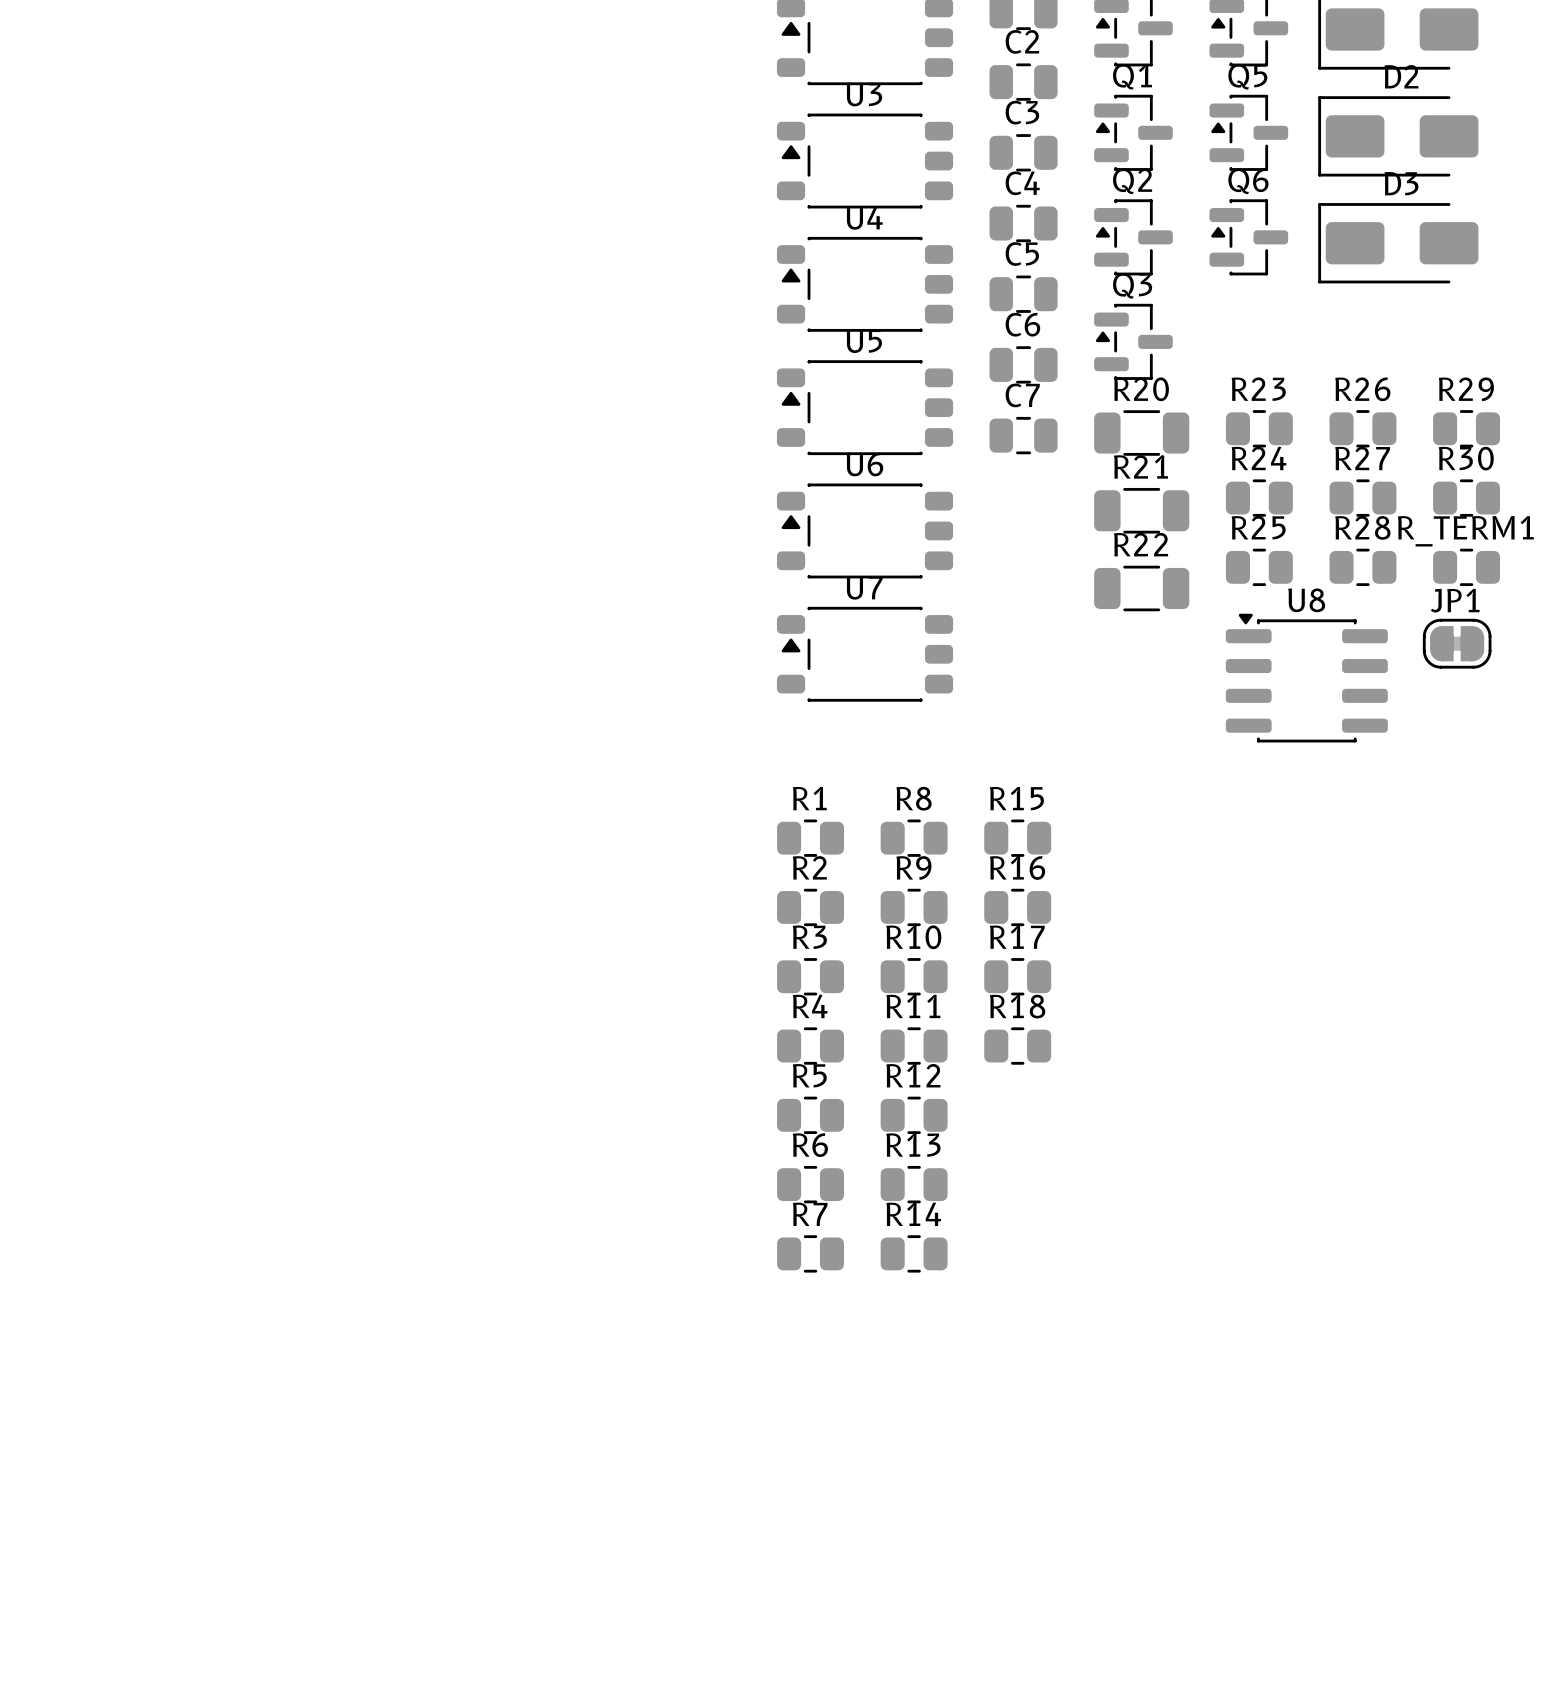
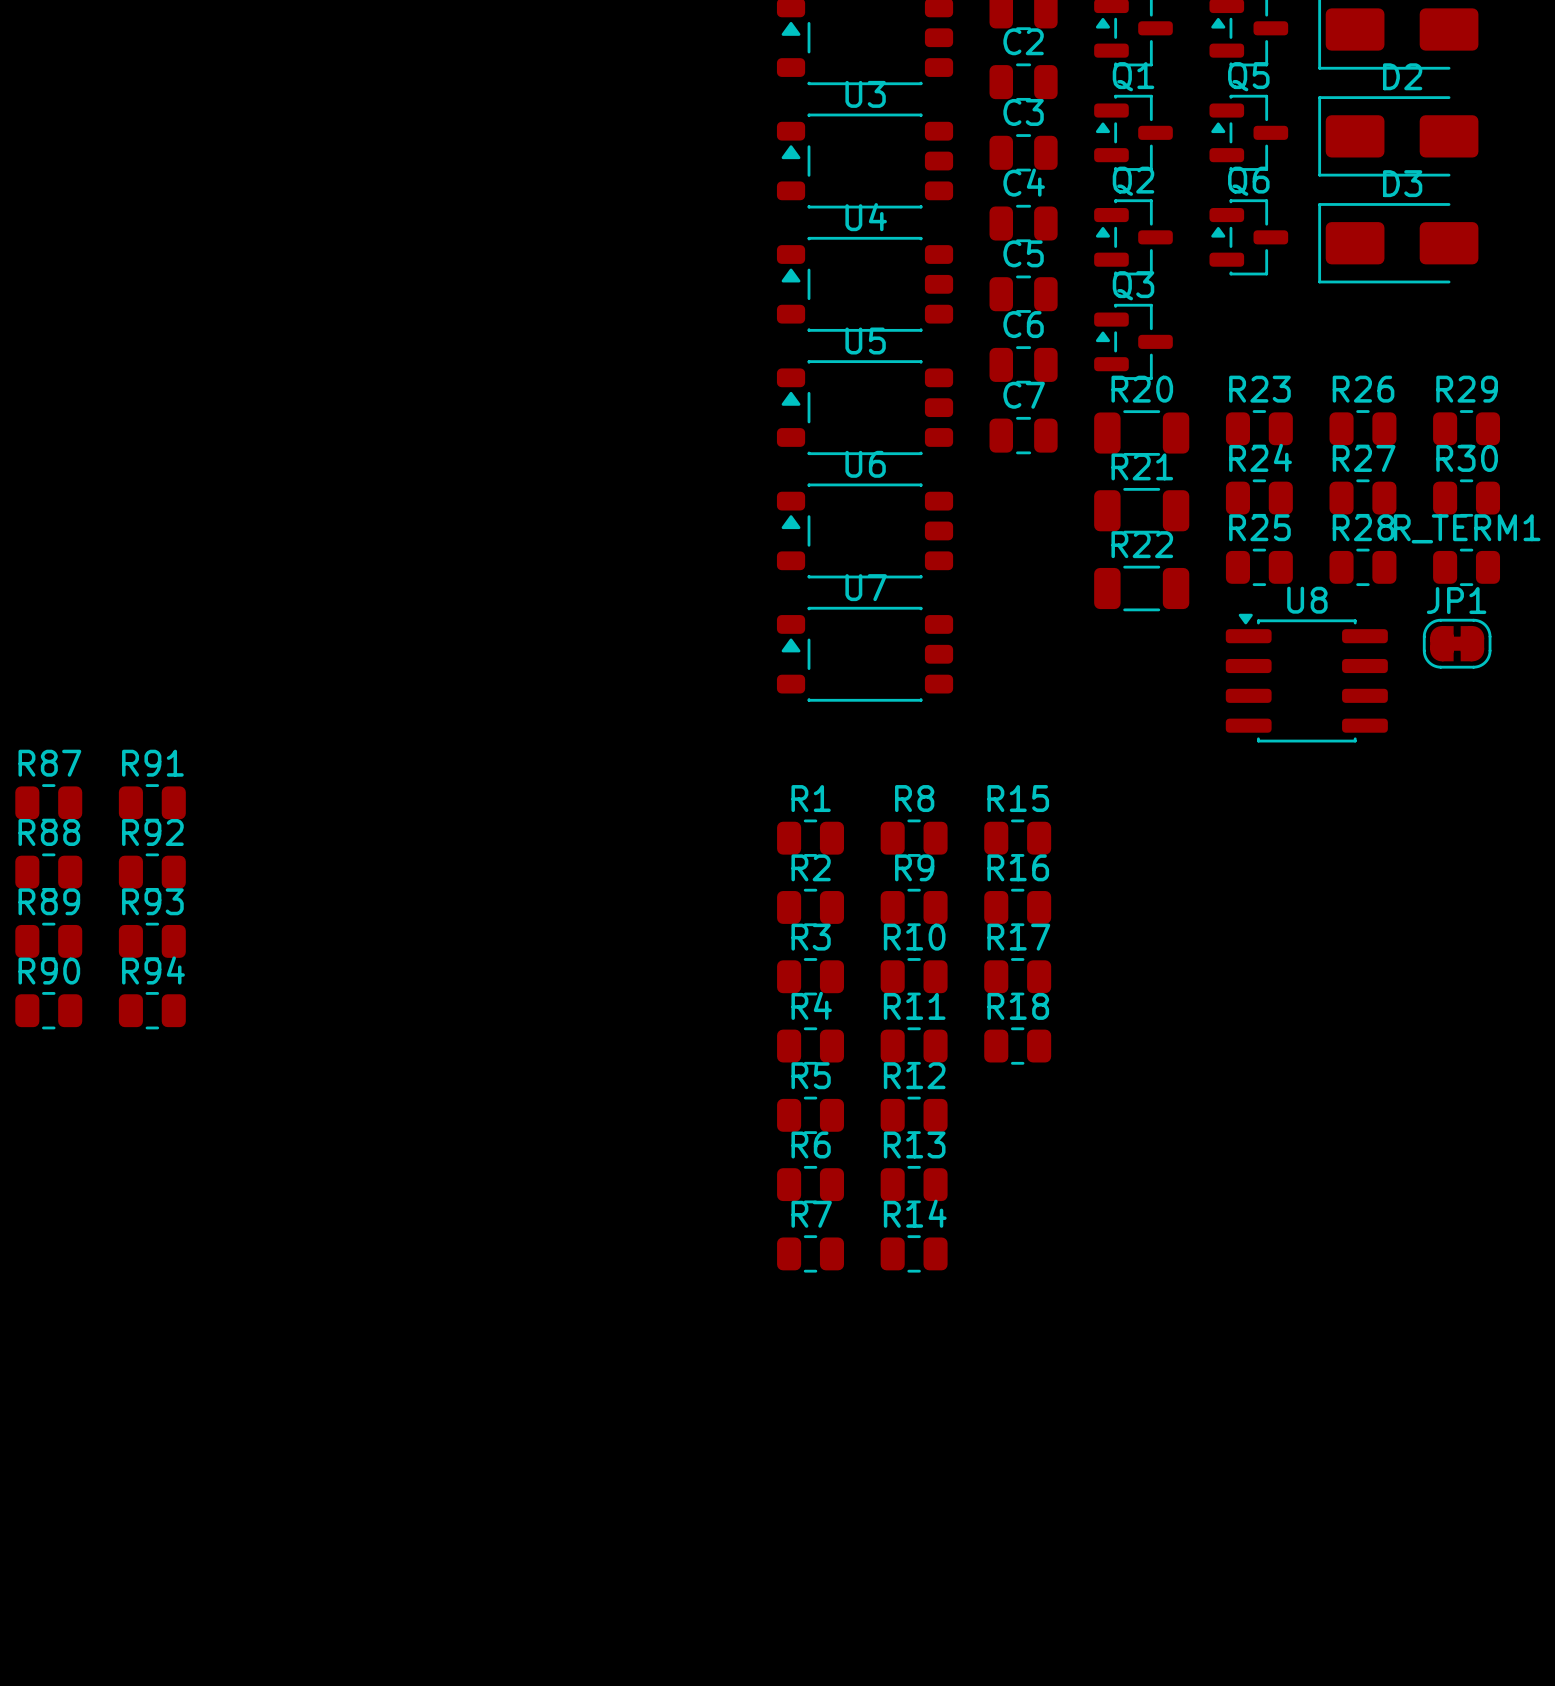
R87: none -> (48, 802)
R91: none -> (152, 802)
R88: none -> (48, 872)
R92: none -> (152, 872)
R89: none -> (48, 941)
R93: none -> (152, 941)
R90: none -> (48, 1010)
R94: none -> (152, 1010)

